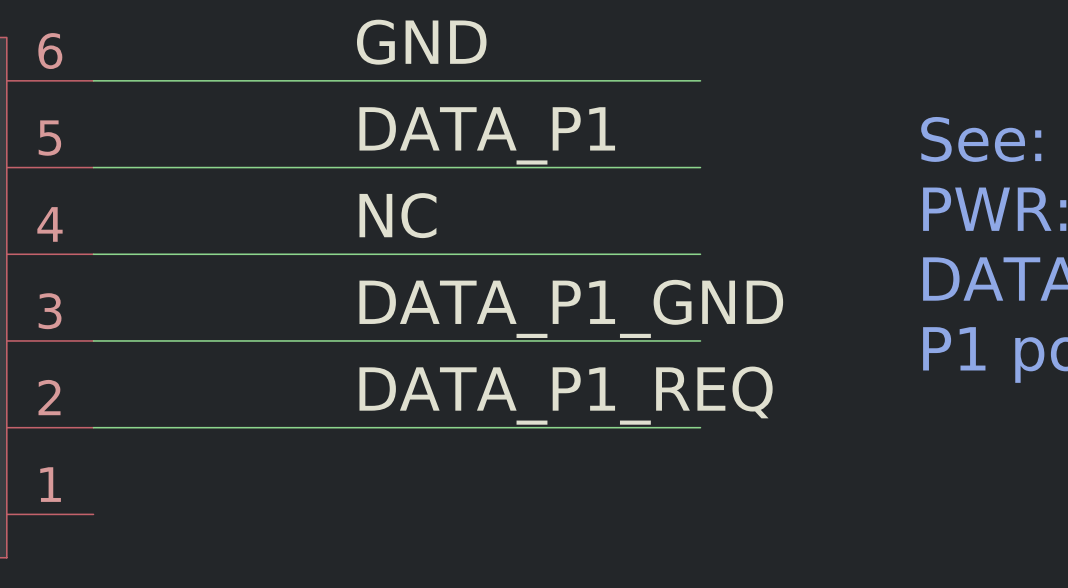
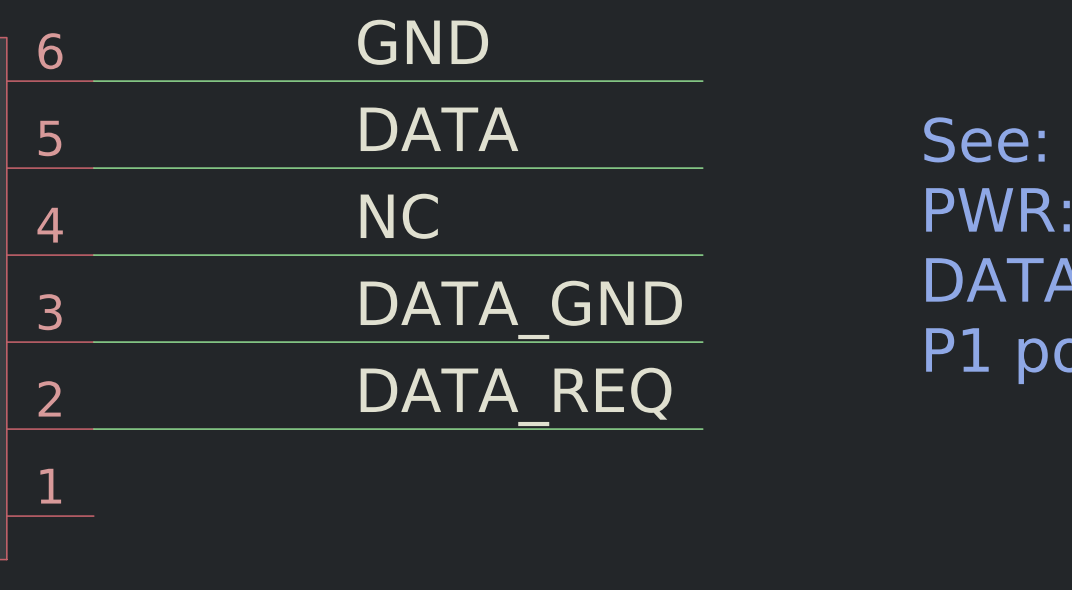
label: DATA_P1 (487, 135) -> DATA (439, 129)
label: DATA_P1_GND (571, 308) -> DATA_GND (521, 309)
label: DATA_P1_REQ (566, 395) -> DATA_REQ (516, 396)

